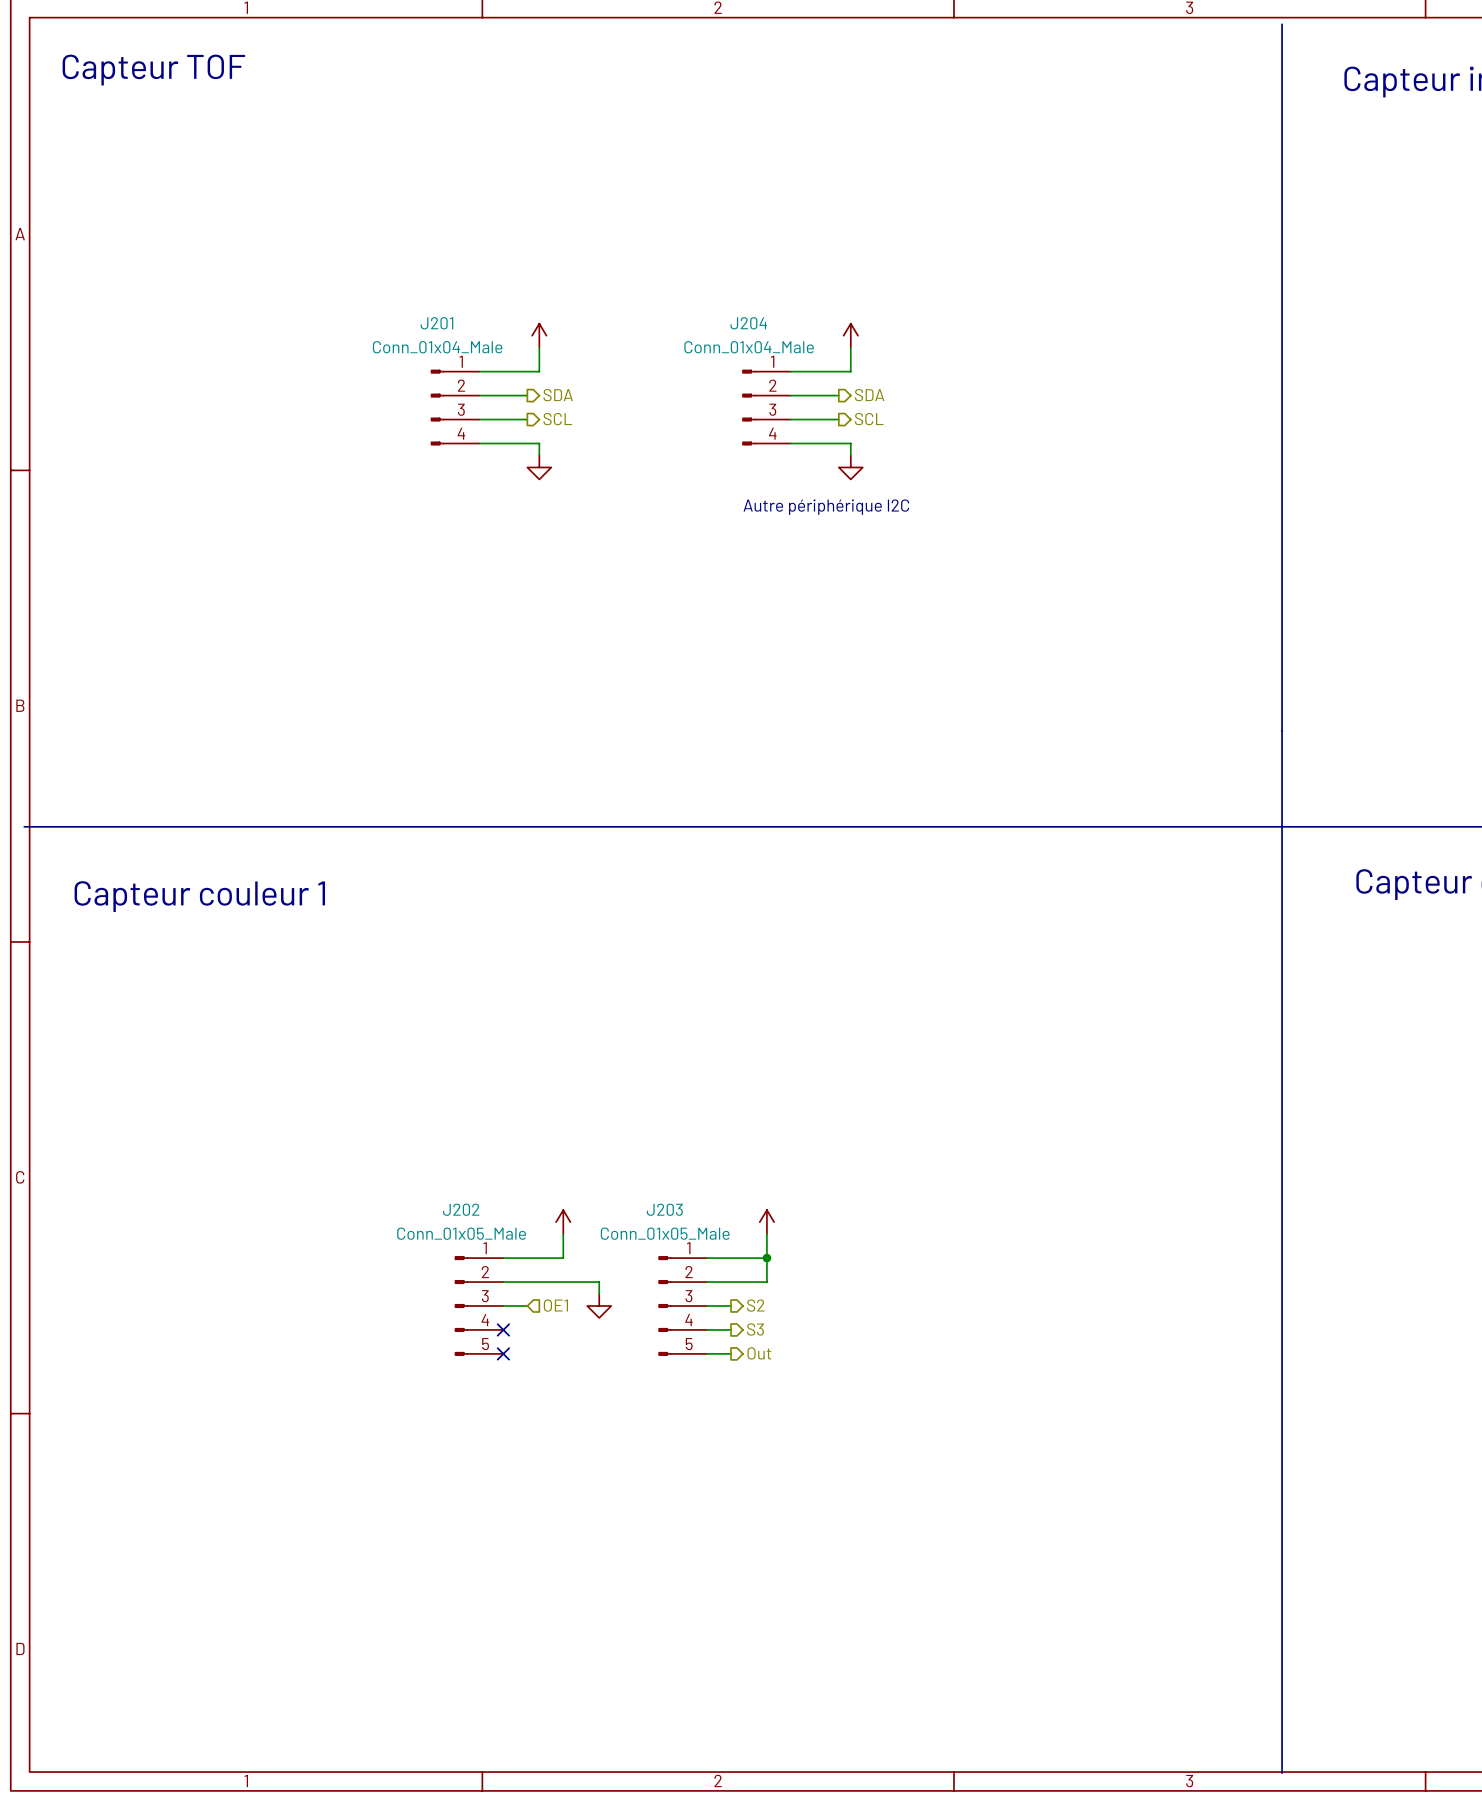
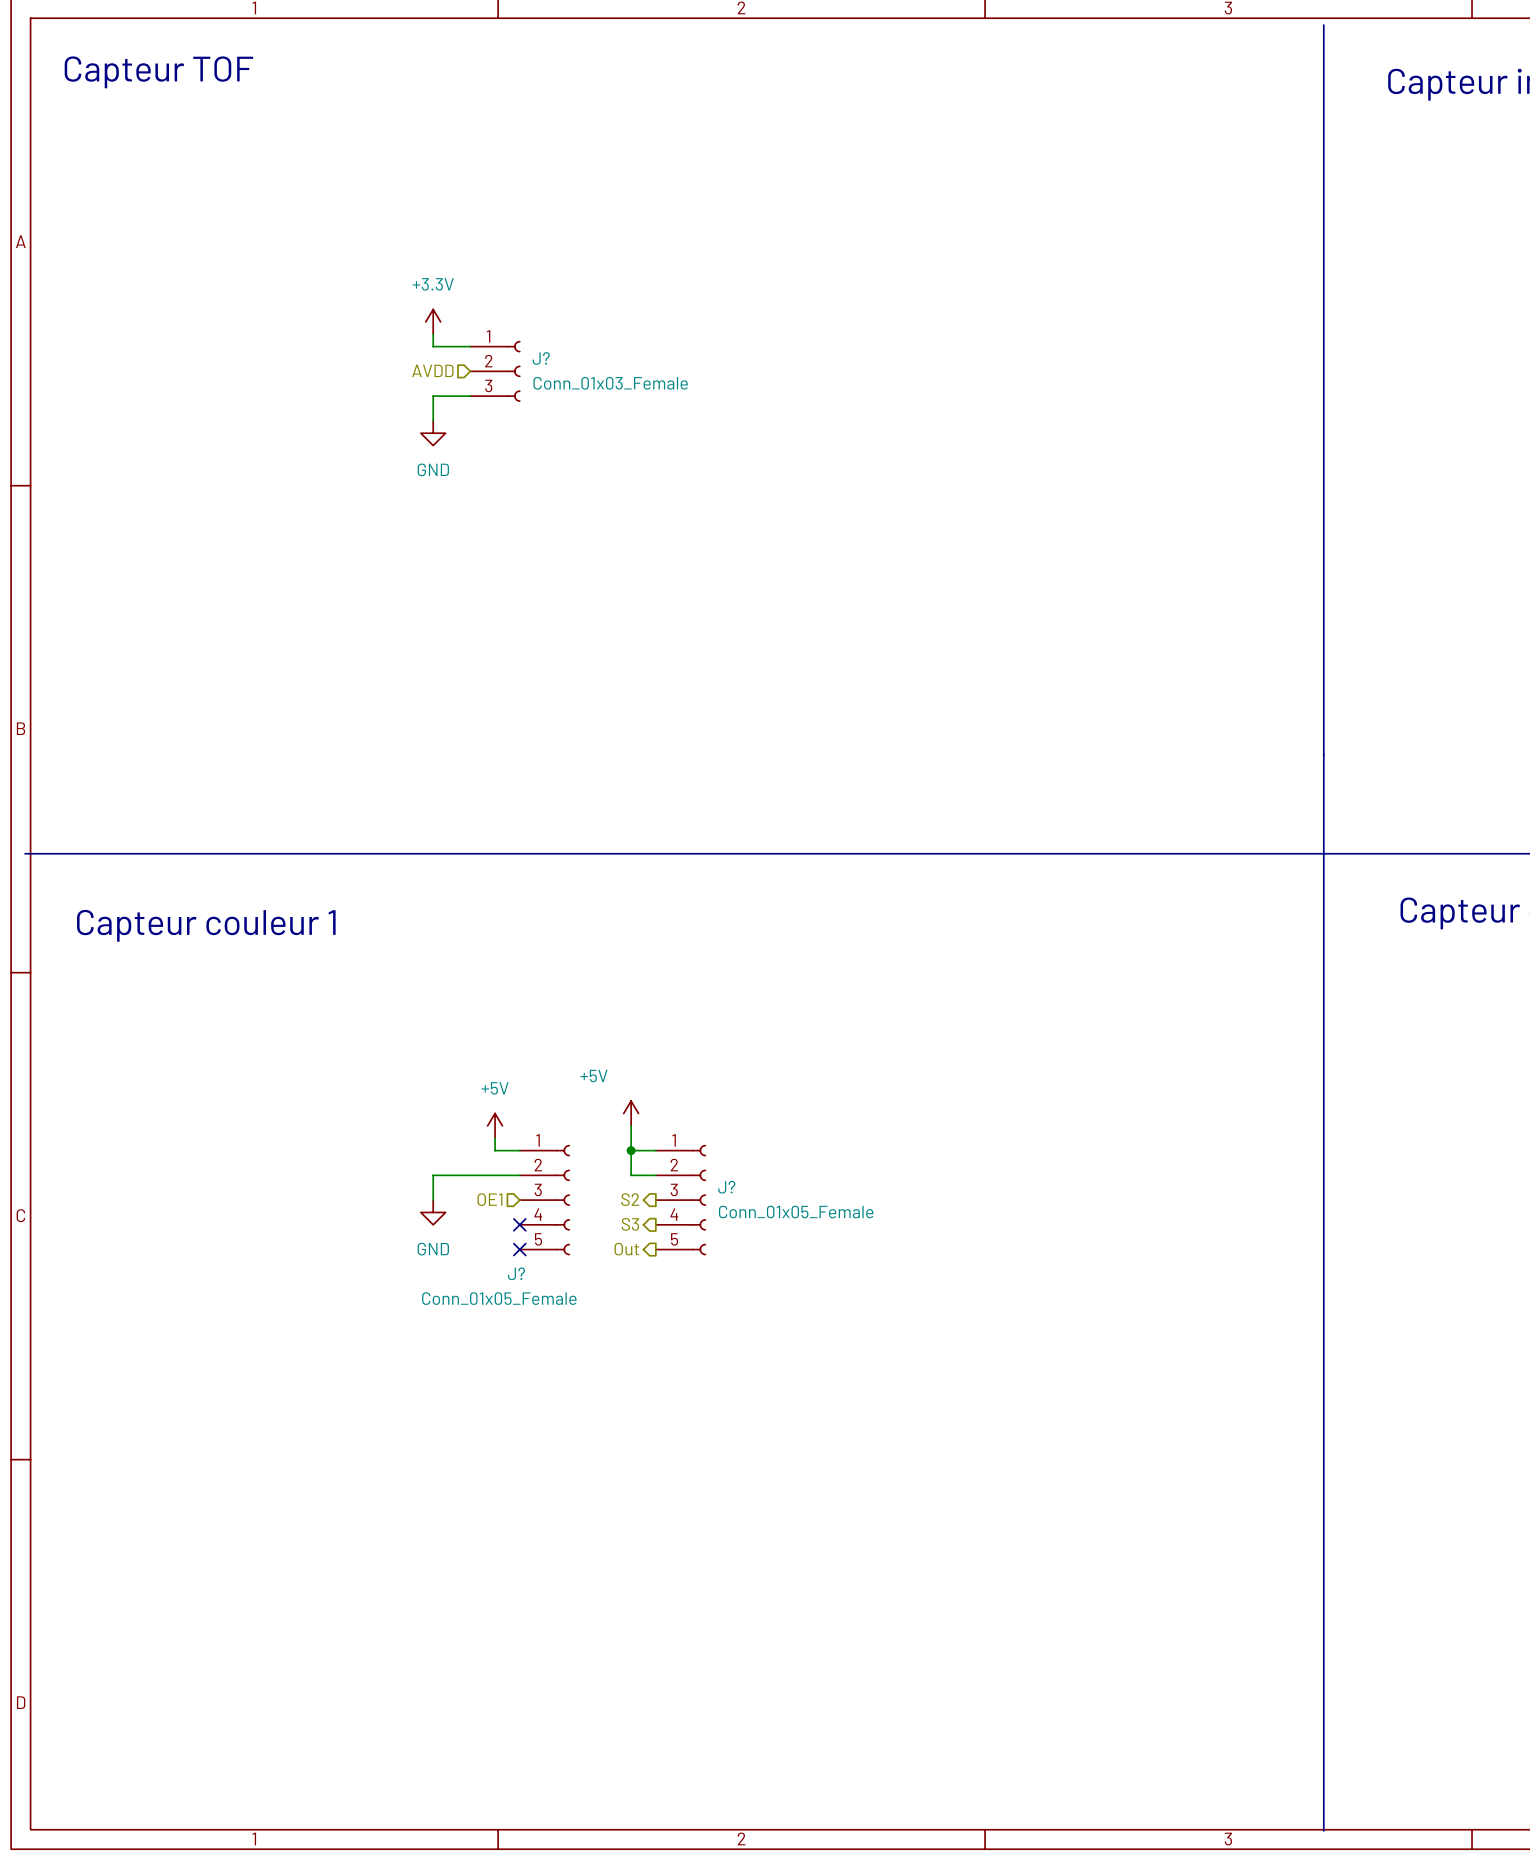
power symbol: none -> +3.3V (433, 321)
wire: none -> (433, 334) (433, 346) (470, 346)
power symbol: (539, 335) -> none
power symbol: (850, 335) -> none
wire: (539, 347) (539, 371) (479, 371) -> none
wire: (850, 347) (850, 371) (790, 371) -> none
hierarchical label: none -> AVDD (432, 370)
J?: none -> Conn_01x03_Female (495, 371)
wire: none -> (470, 396) (433, 396) (433, 420)
wire: (479, 395) (527, 395) -> none
hierarchical label: SDA (558, 395) -> none
wire: (790, 395) (838, 395) -> none
hierarchical label: SDA (869, 395) -> none
J201: Conn_01x04_Male (455, 407) -> none
J204: Conn_01x04_Male (766, 407) -> none
power symbol: none -> GND (433, 433)
wire: (479, 419) (527, 419) -> none
hierarchical label: SCL (557, 419) -> none
wire: (790, 419) (838, 419) -> none
hierarchical label: SCL (869, 419) -> none
wire: (479, 443) (539, 443) (539, 455) -> none
wire: (790, 443) (850, 443) (850, 455) -> none
power symbol: (539, 467) -> none
power symbol: (850, 467) -> none
text: Autre périphérique I2C (826, 507) -> none
power symbol: none -> +5V (631, 1113)
power symbol: none -> +5V (495, 1125)
wire: none -> (631, 1125) (631, 1175) (655, 1175)
wire: none -> (495, 1138) (495, 1150) (519, 1150)
junction: none -> (631, 1150)
wire: none -> (519, 1175) (433, 1175) (433, 1200)
J?: none -> Conn_01x05_Female (544, 1200)
J?: none -> Conn_01x05_Female (680, 1200)
power symbol: none -> GND (433, 1212)
no-connect mark: none -> (519, 1224)
no-connect mark: none -> (519, 1249)
power symbol: (563, 1222) -> none
power symbol: (766, 1222) -> none
wire: (563, 1234) (563, 1258) (503, 1258) -> none
wire: (766, 1234) (766, 1282) (707, 1282) -> none
wire: (707, 1258) (766, 1258) -> none
junction: (766, 1258) -> none
wire: (503, 1282) (599, 1282) (599, 1294) -> none
hierarchical label rotation: 0° (555, 1305) -> 180° (489, 1199)
hierarchical label position: OE1 (555, 1305) -> OE1 (489, 1199)
hierarchical label rotation: 0° (755, 1305) -> 180° (630, 1199)
hierarchical label position: S2 (755, 1305) -> S2 (630, 1199)
J202: Conn_01x05_Male (479, 1306) -> none
wire: (503, 1306) (527, 1306) -> none
power symbol: (599, 1306) -> none
J203: Conn_01x05_Male (682, 1306) -> none
wire: (707, 1306) (731, 1306) -> (631, 1150) (655, 1150)
no-connect mark: (503, 1329) -> none
wire: (707, 1329) (731, 1329) -> none
hierarchical label rotation: 0° (755, 1329) -> 180° (630, 1224)
hierarchical label position: S3 (755, 1329) -> S3 (630, 1224)
no-connect mark: (503, 1353) -> none
wire: (707, 1353) (731, 1353) -> none
hierarchical label rotation: 0° (759, 1353) -> 180° (626, 1249)
hierarchical label position: Out (759, 1353) -> Out (626, 1249)

